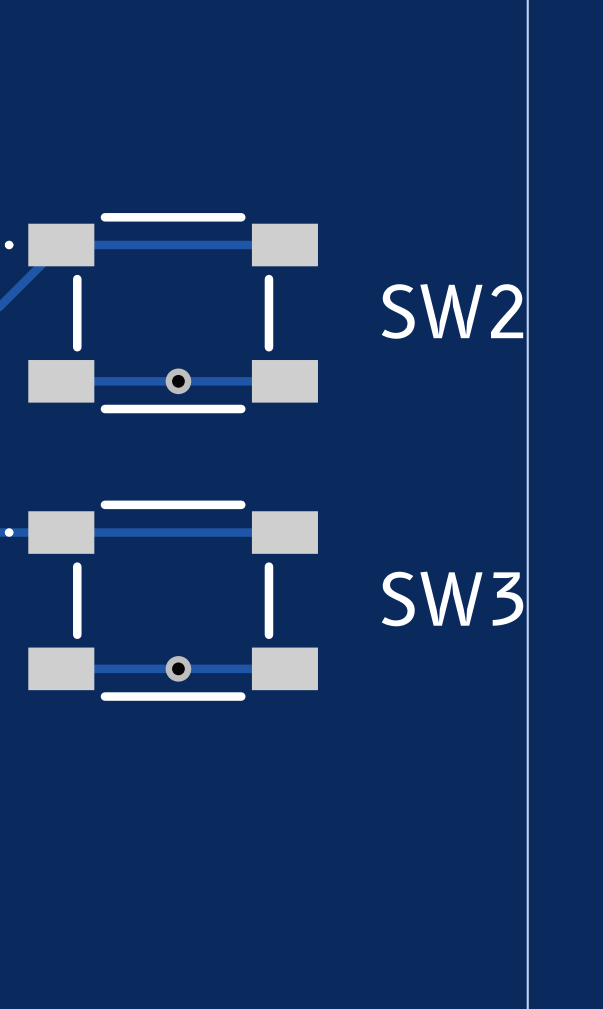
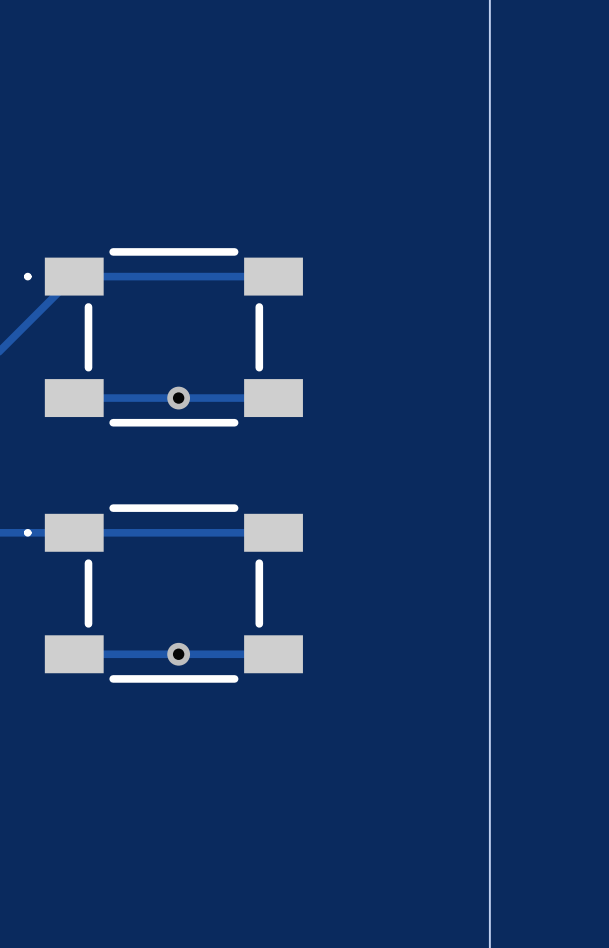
SW2 name: SW2 (452, 311) -> none
SW3 name: SW3 (452, 598) -> none

